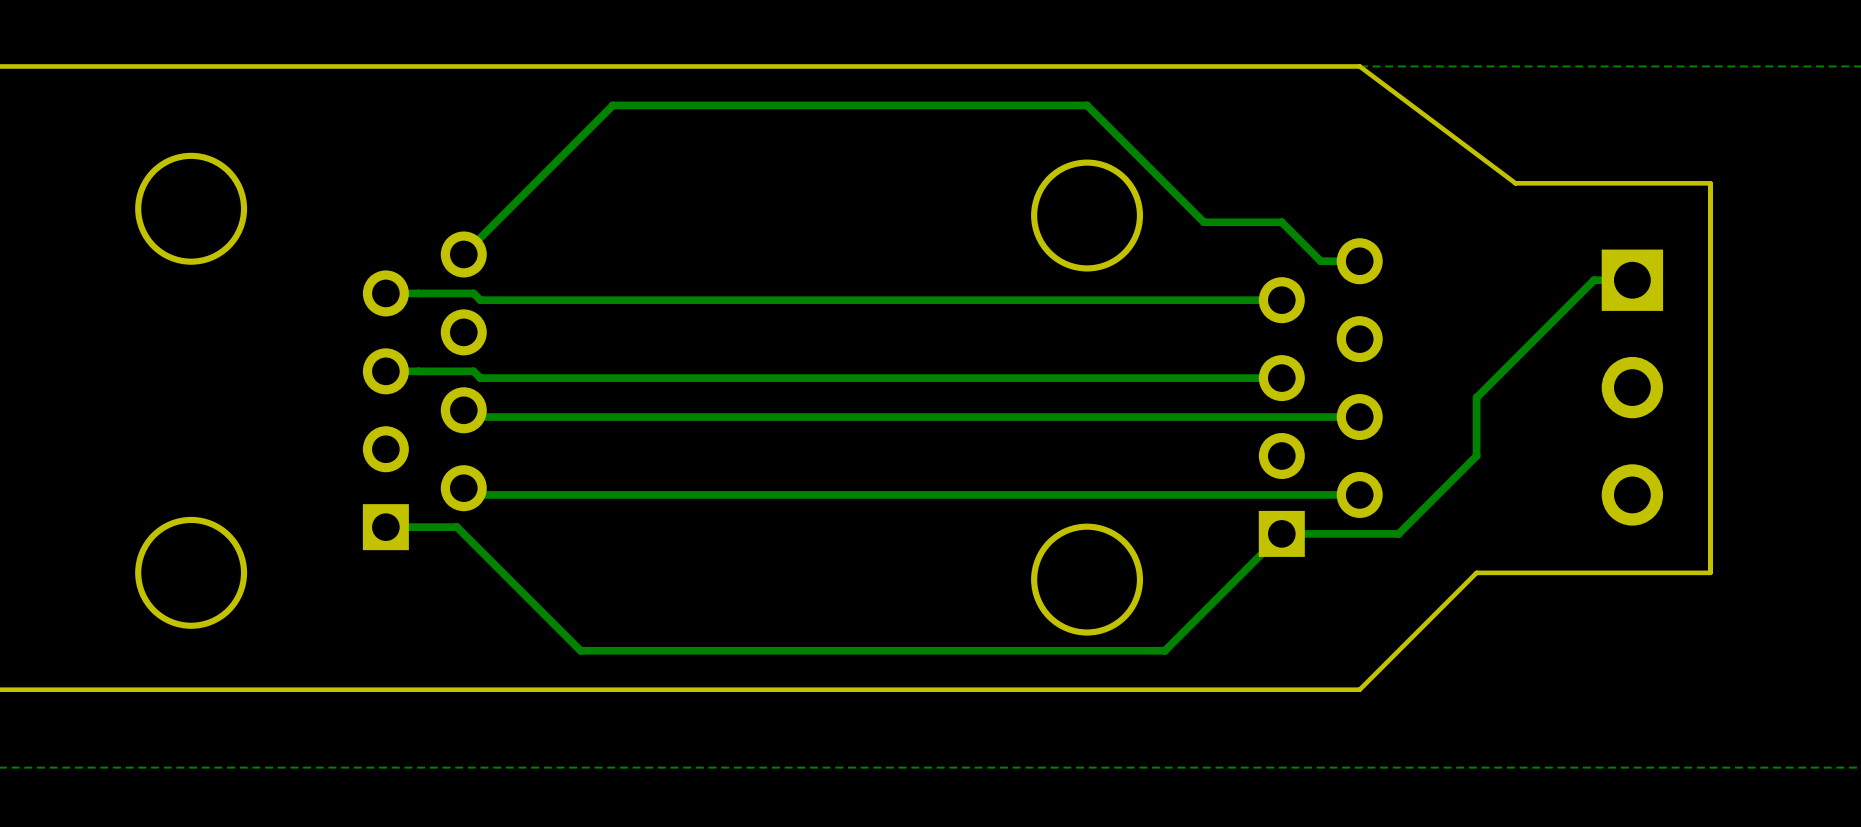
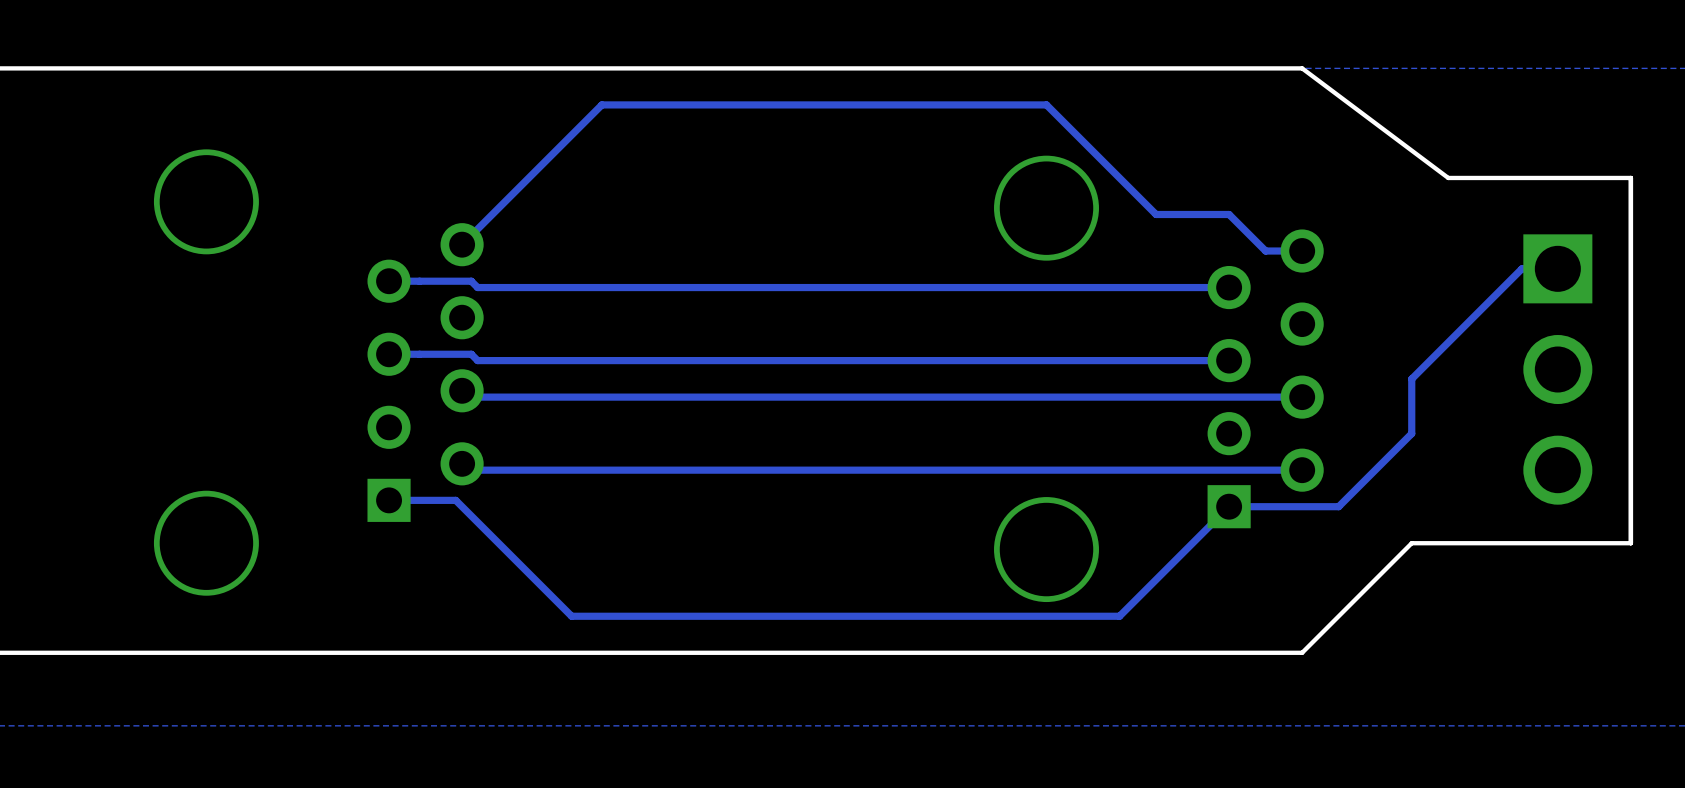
part footprint: [1601, 249, 1664, 526] -> [1523, 234, 1593, 505]

